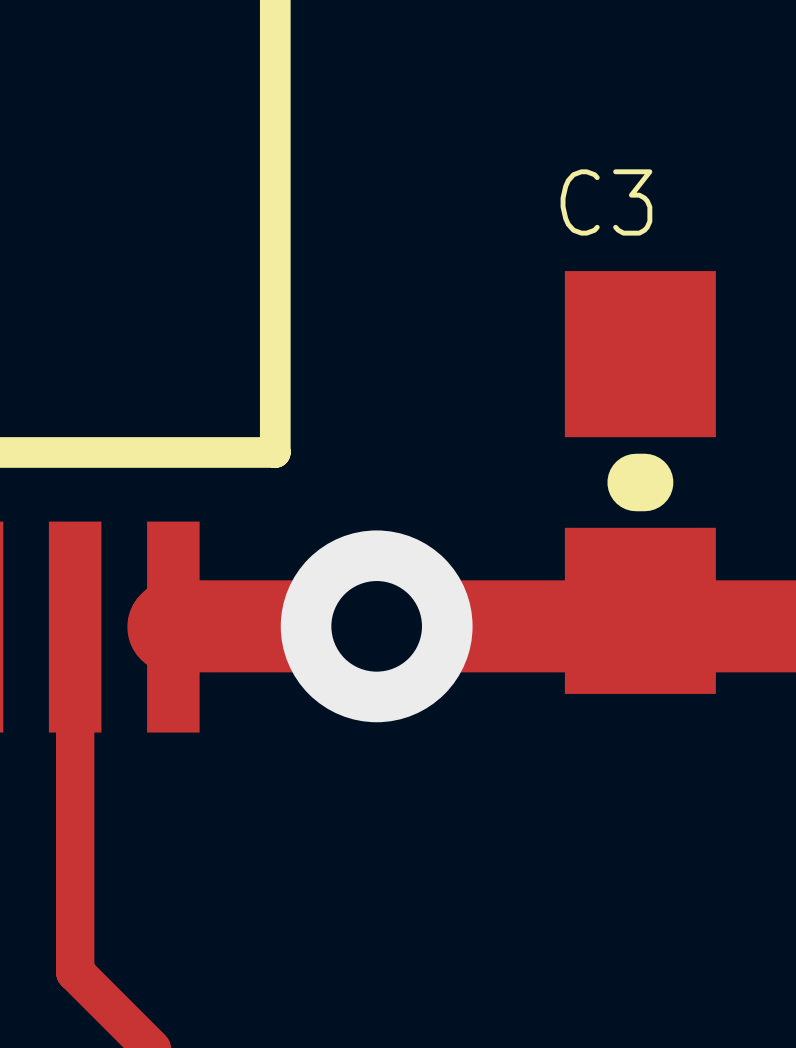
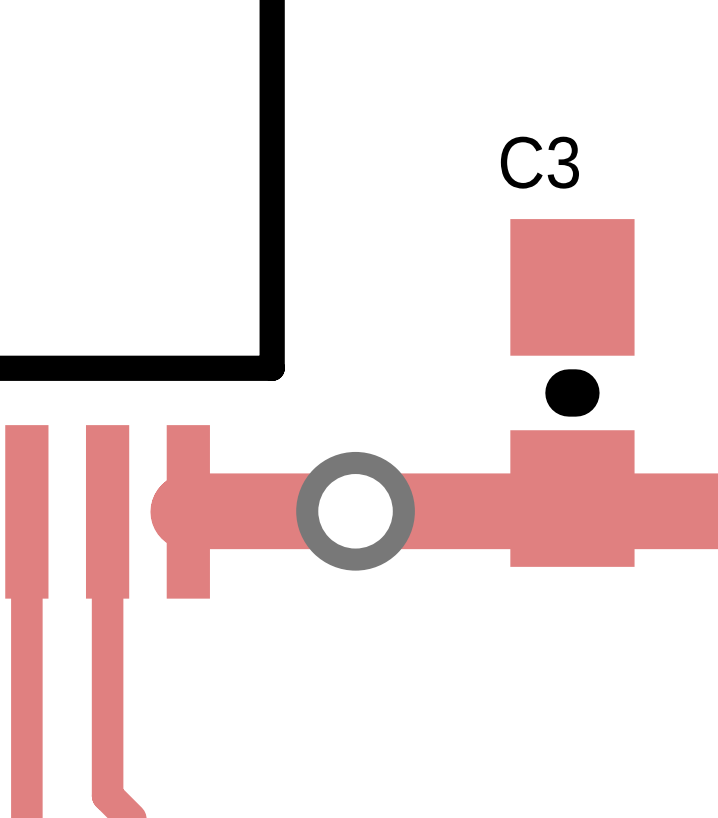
via size: [280, 530, 473, 723] -> [296, 451, 415, 571]

